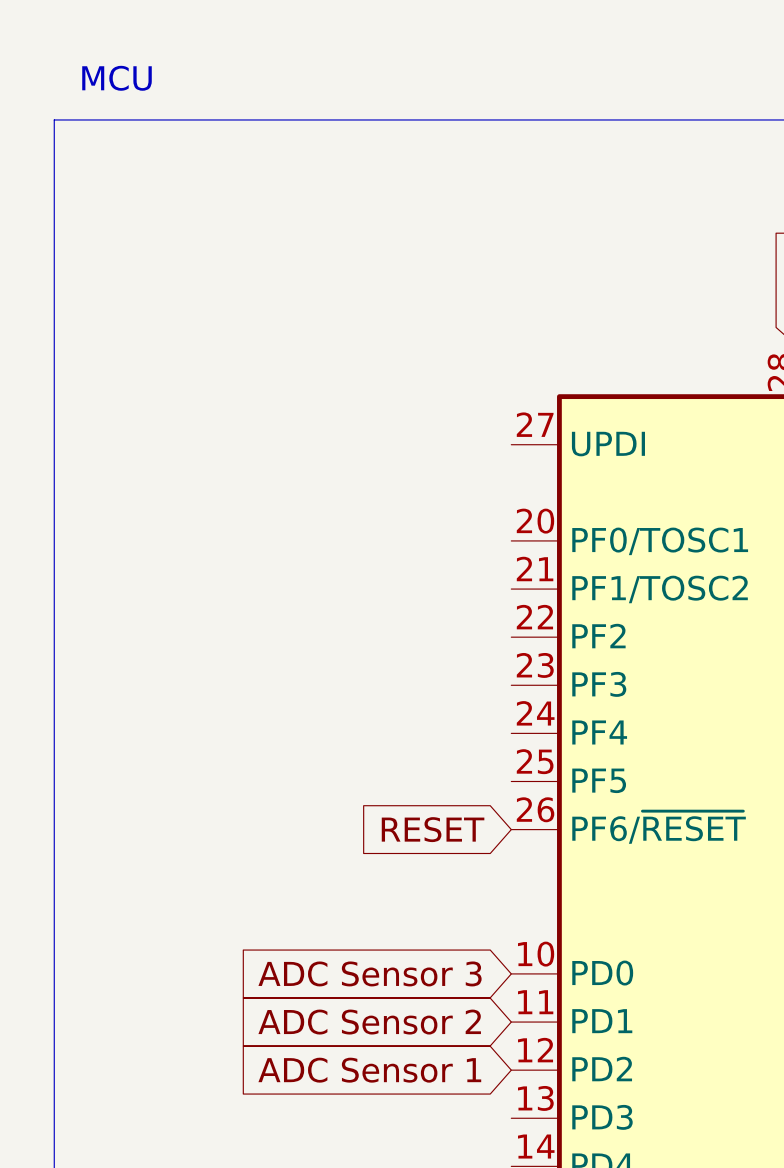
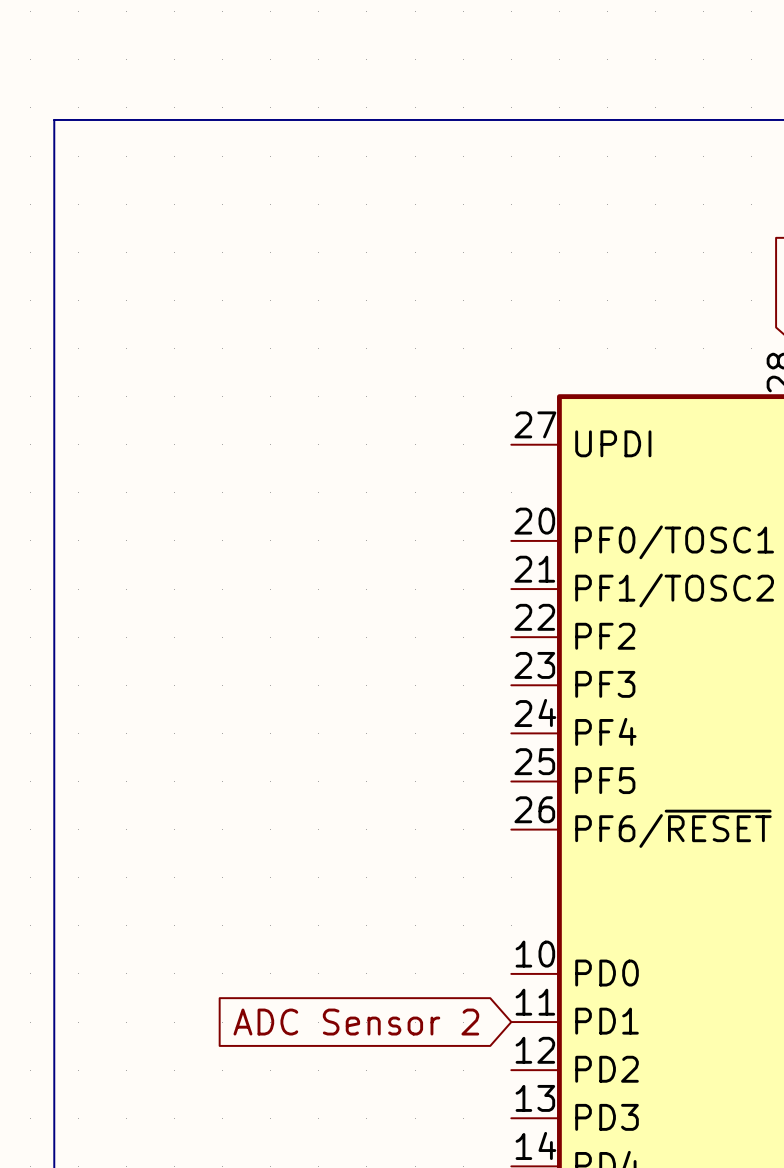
text: MCU (117, 78) -> none
global label: RESET (433, 829) -> none
global label: ADC Sensor 3 (370, 973) -> none
global label: ADC Sensor 1 (369, 1070) -> none

